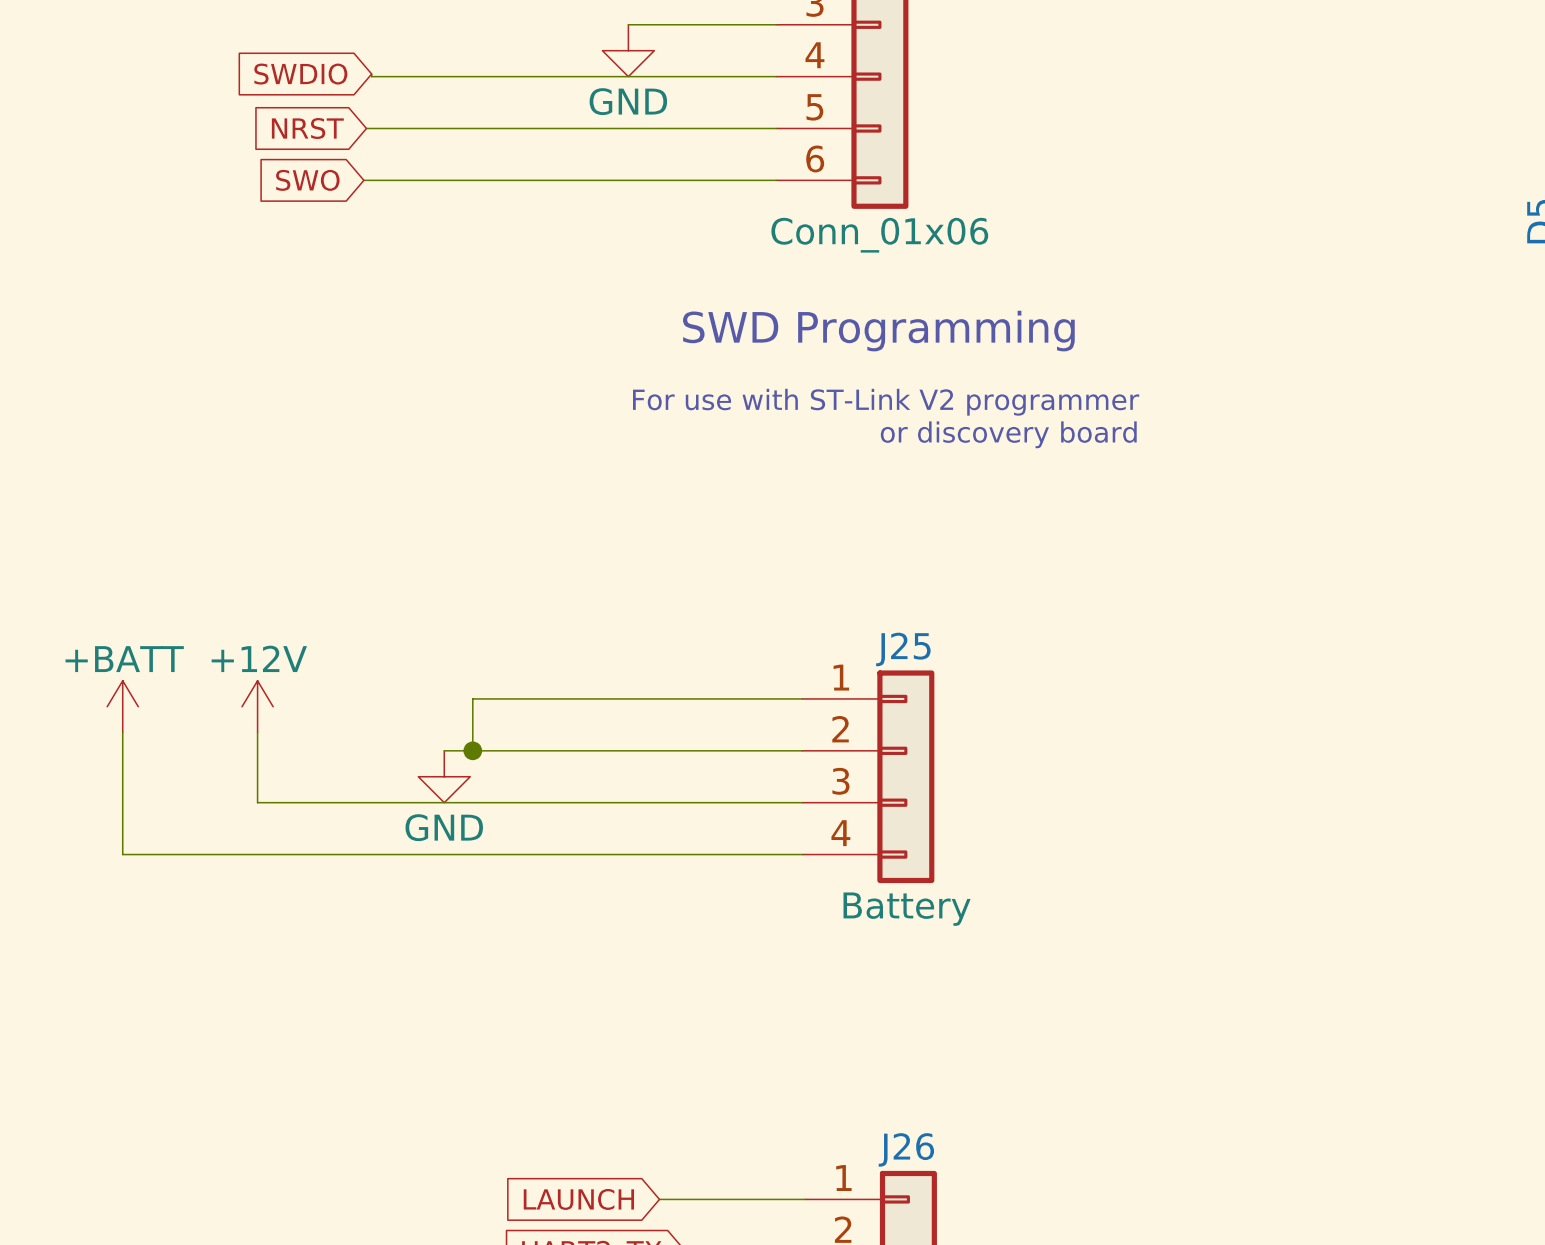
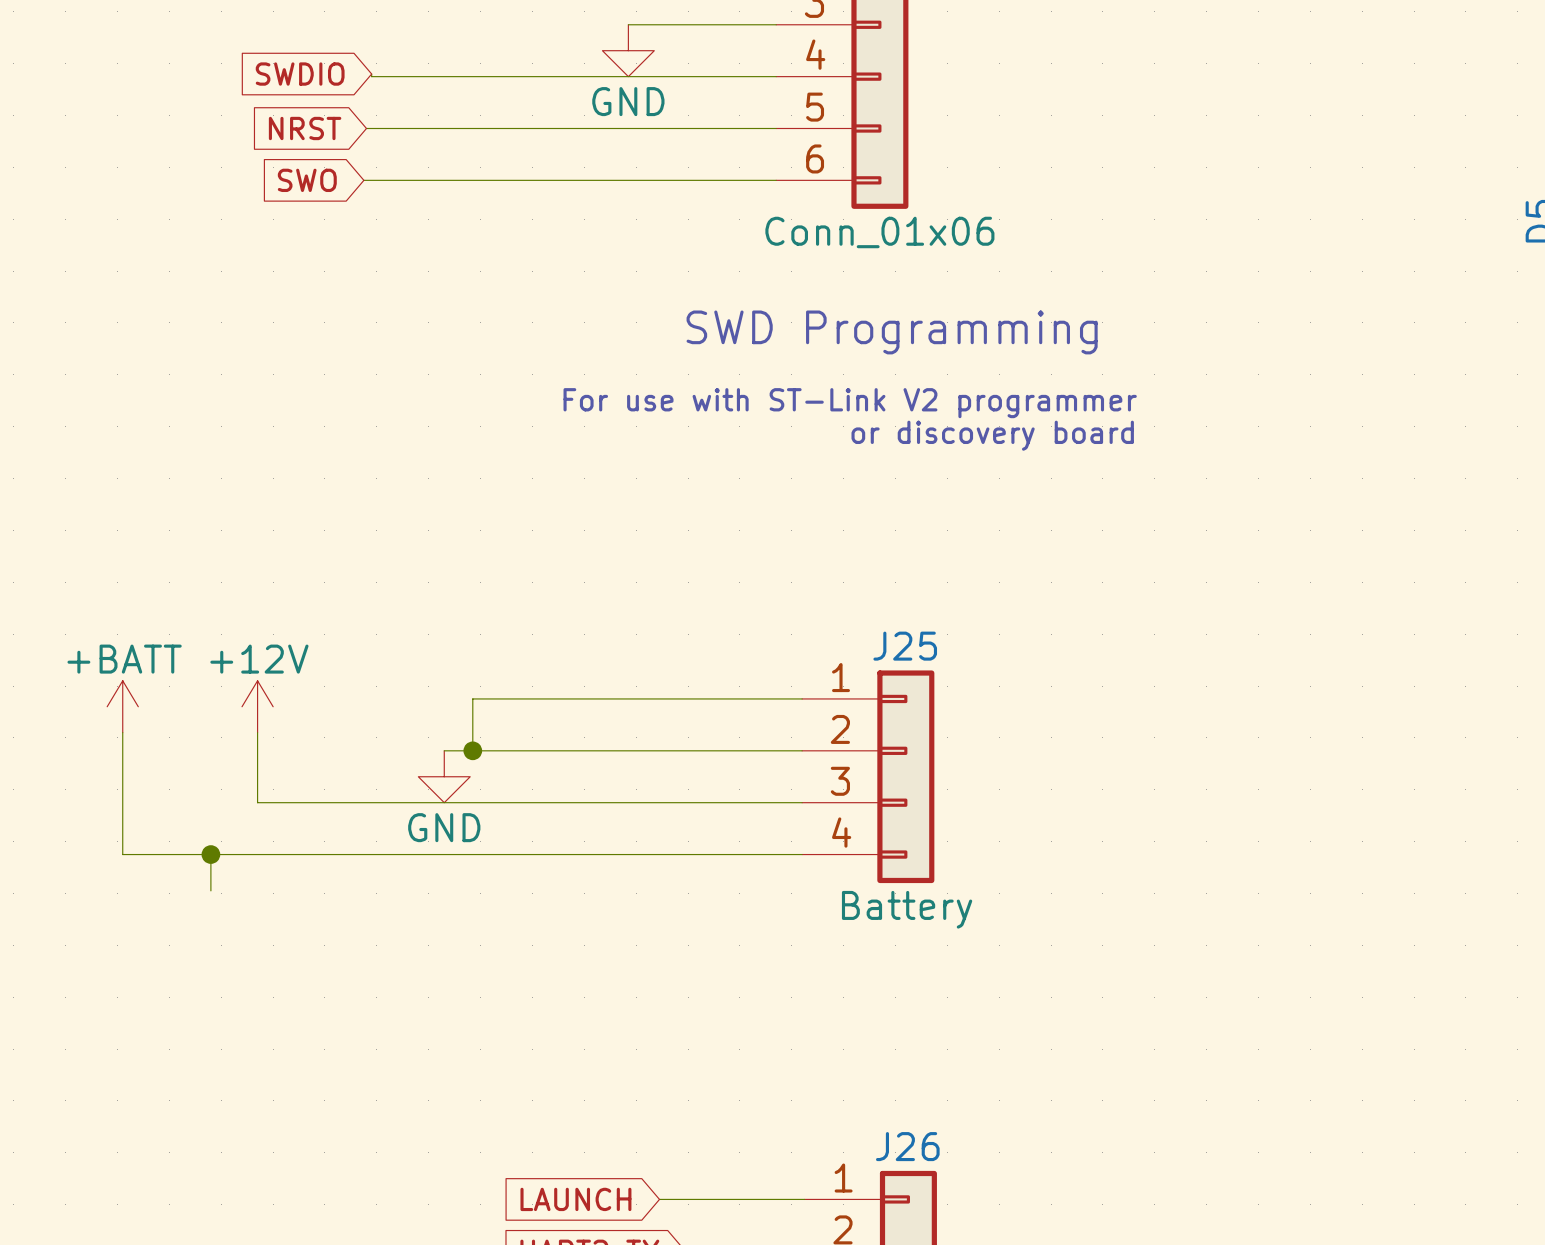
wire: none -> (210, 854) (210, 890)
junction: none -> (210, 854)

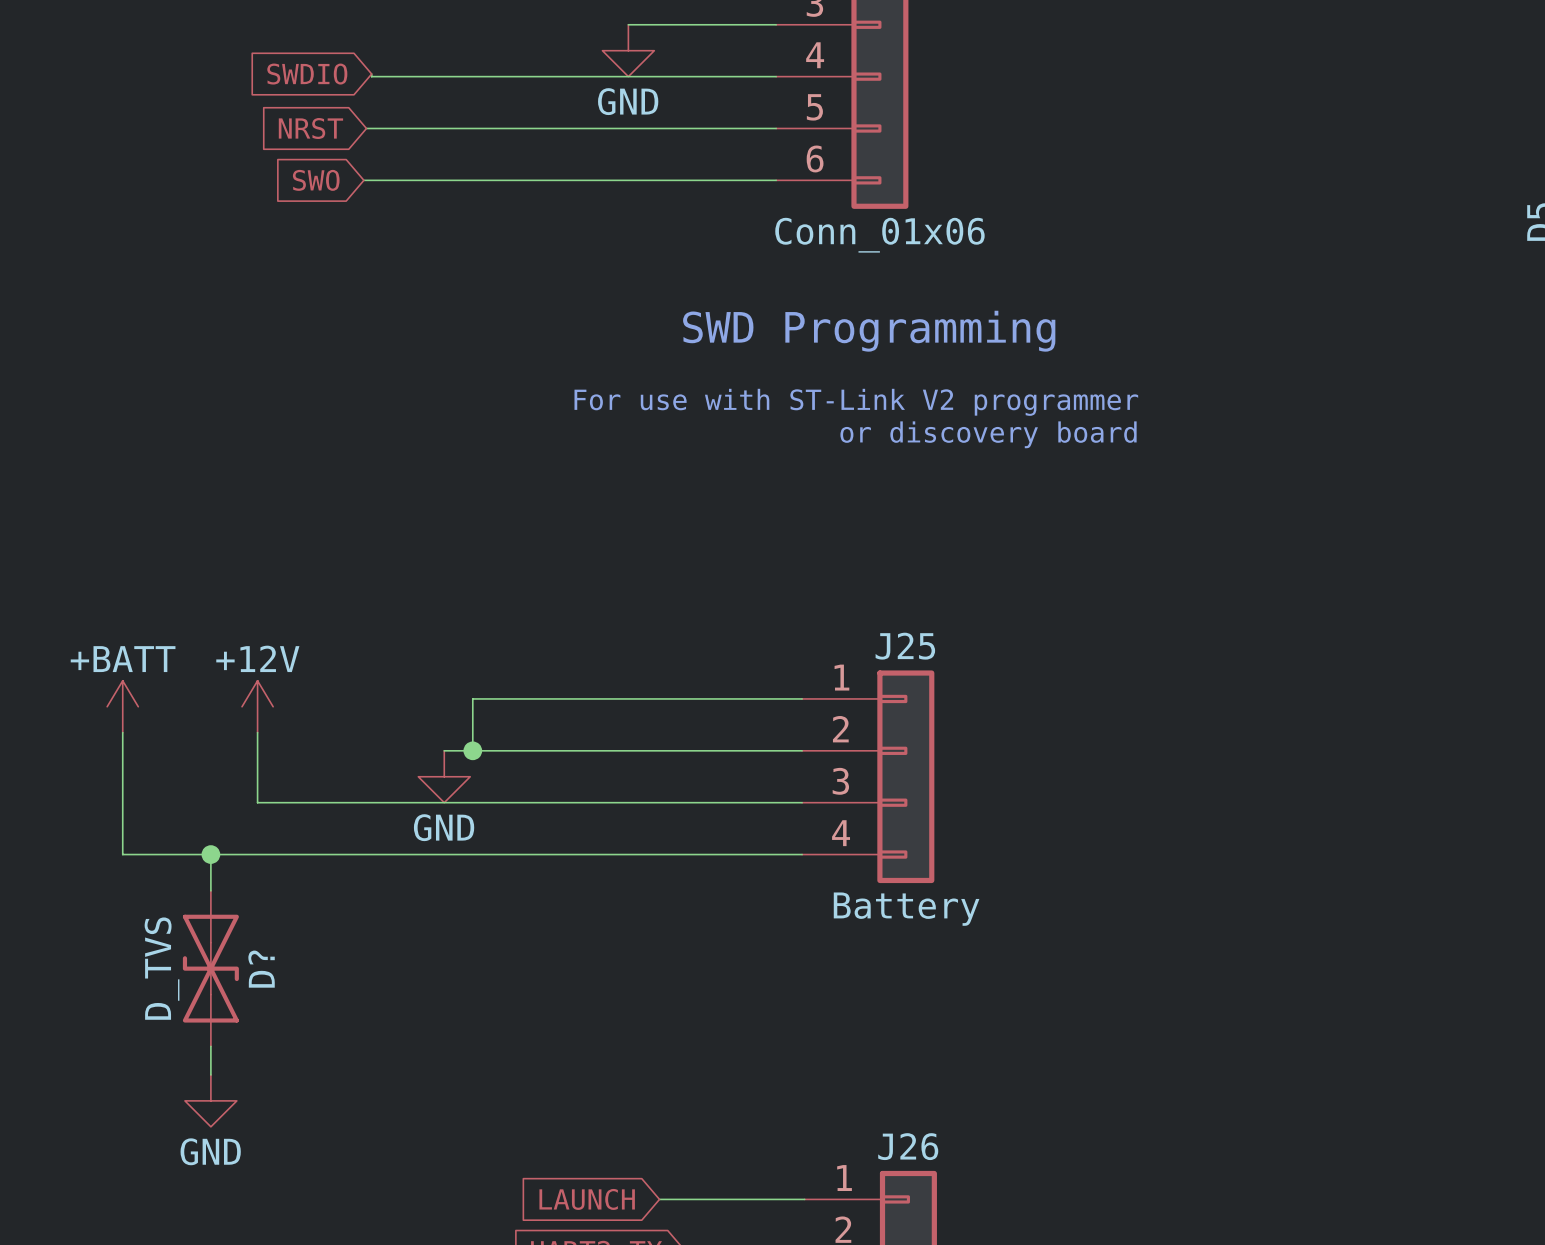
D?: none -> D_TVS (210, 968)
wire: none -> (210, 1046) (210, 1074)
power symbol: none -> GND (210, 1100)

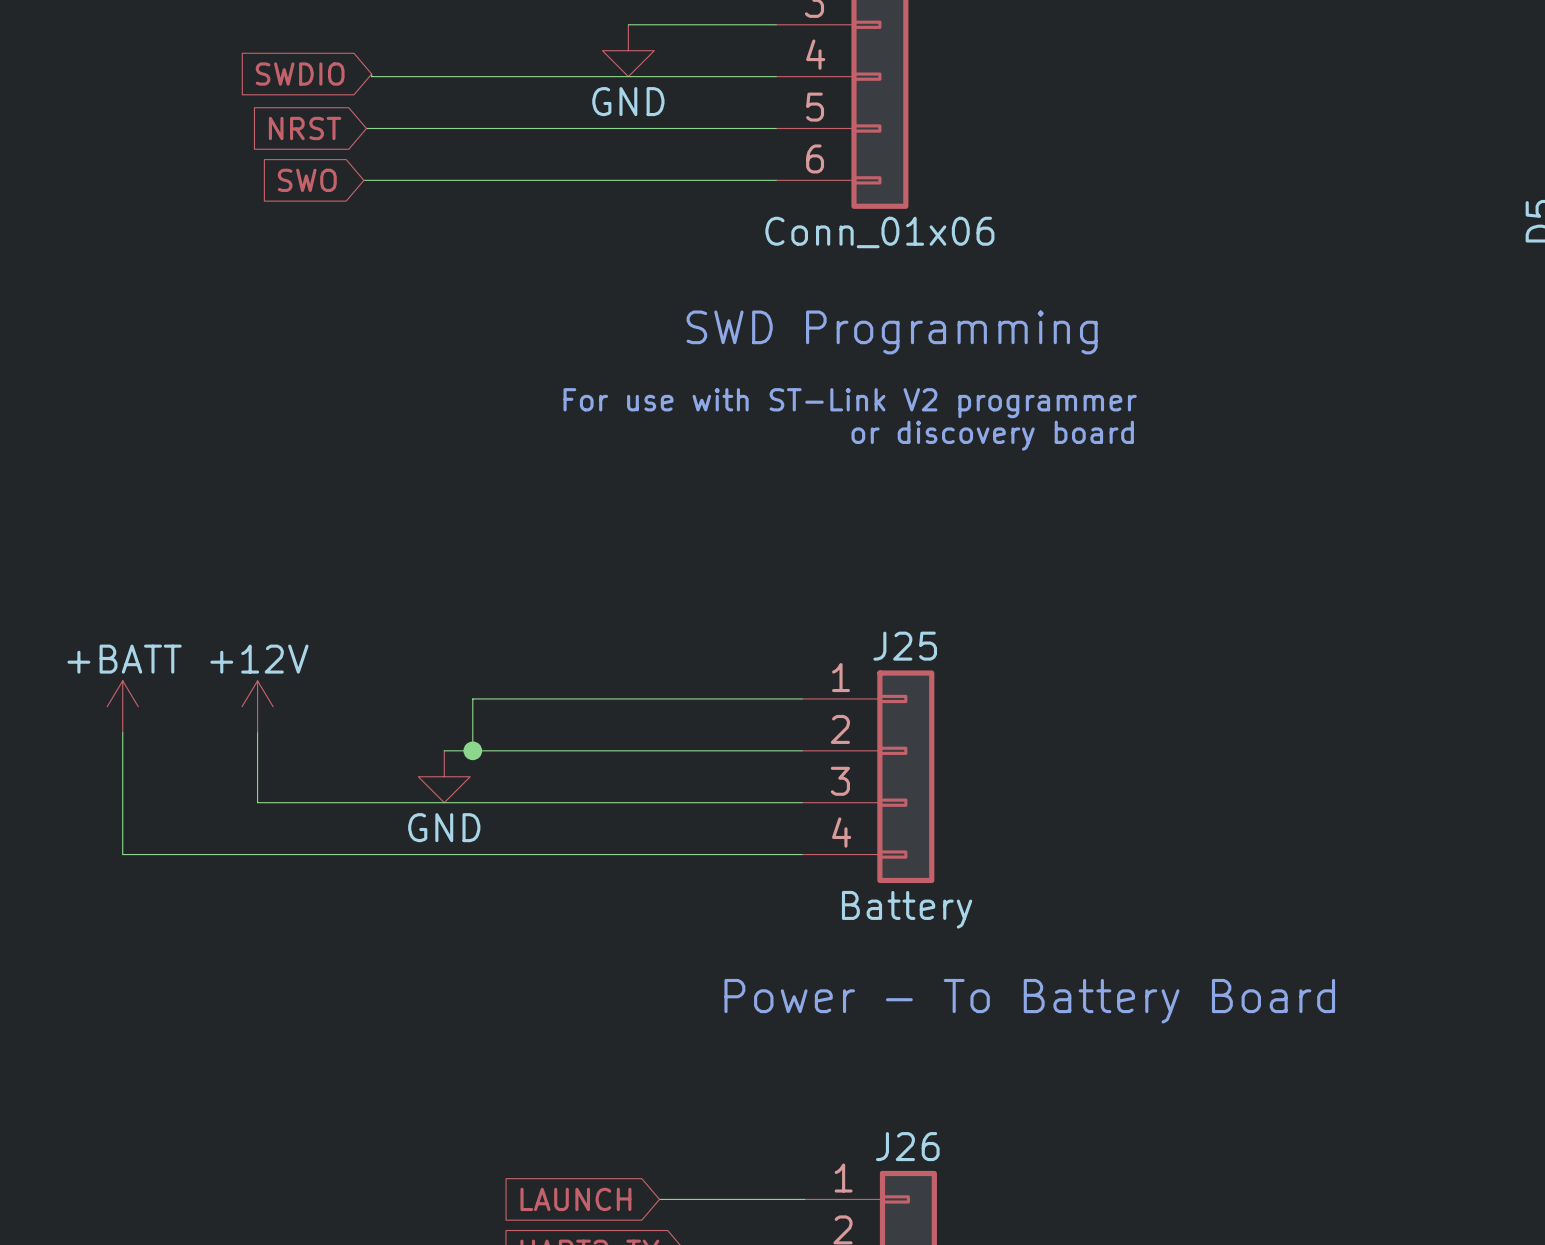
wire: (210, 854) (210, 890) -> none
junction: (210, 854) -> none
D?: D_TVS (210, 968) -> none
text: none -> Power - To Battery Board (1029, 1001)
wire: (210, 1046) (210, 1074) -> none
power symbol: GND (210, 1100) -> none

